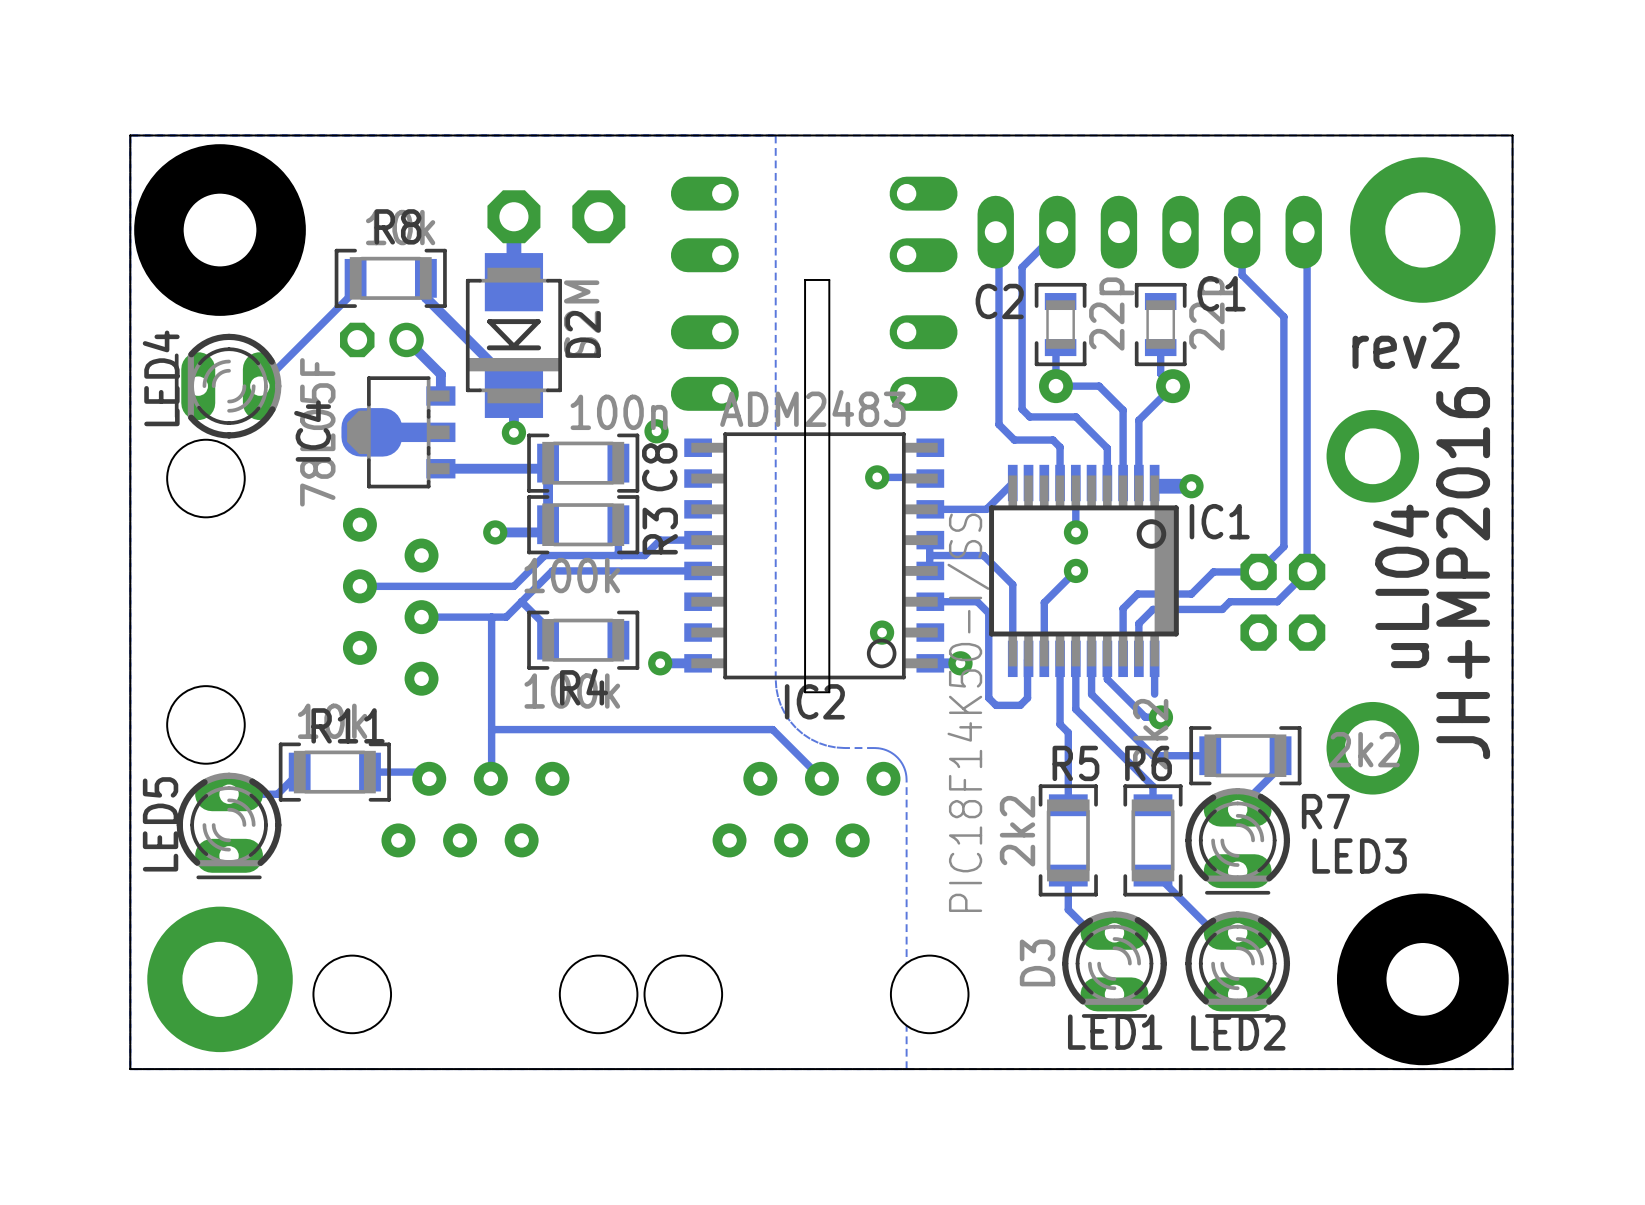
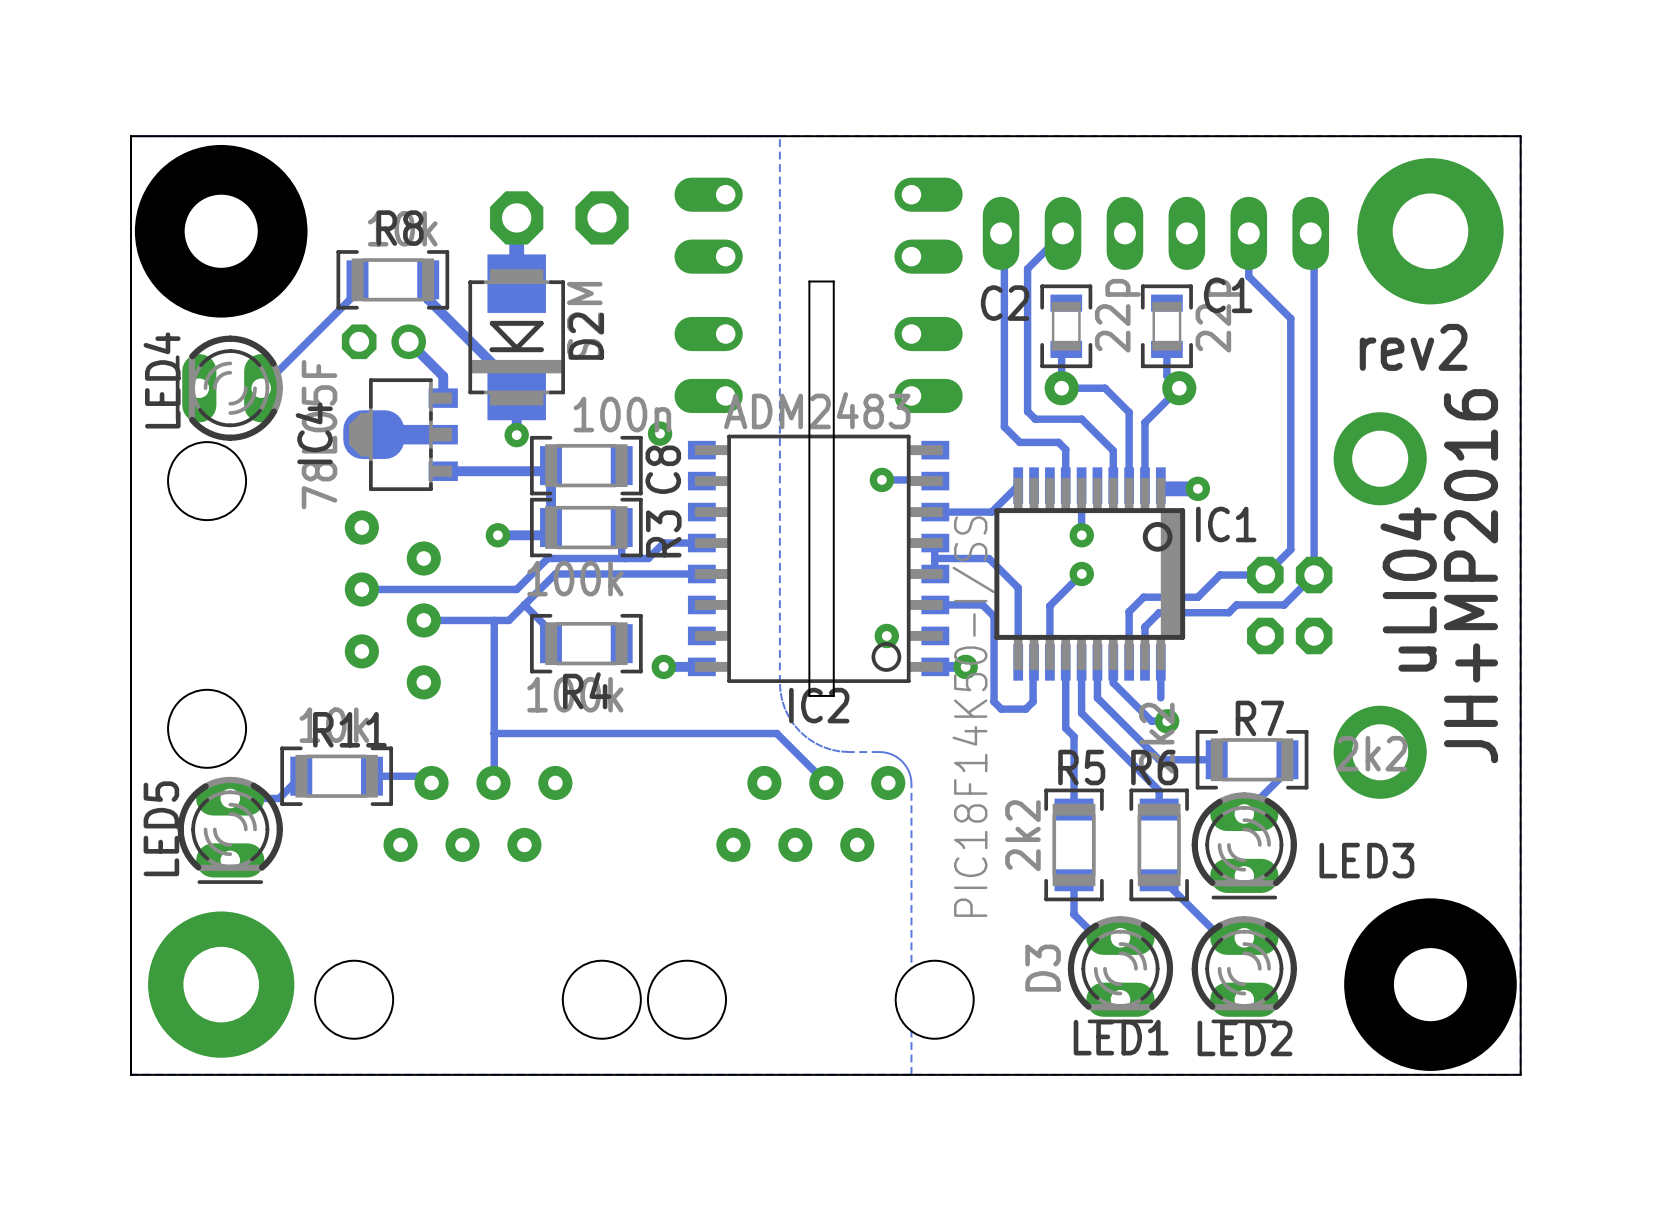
R7 name position: R7 (1325, 811) -> R7 (1259, 718)

